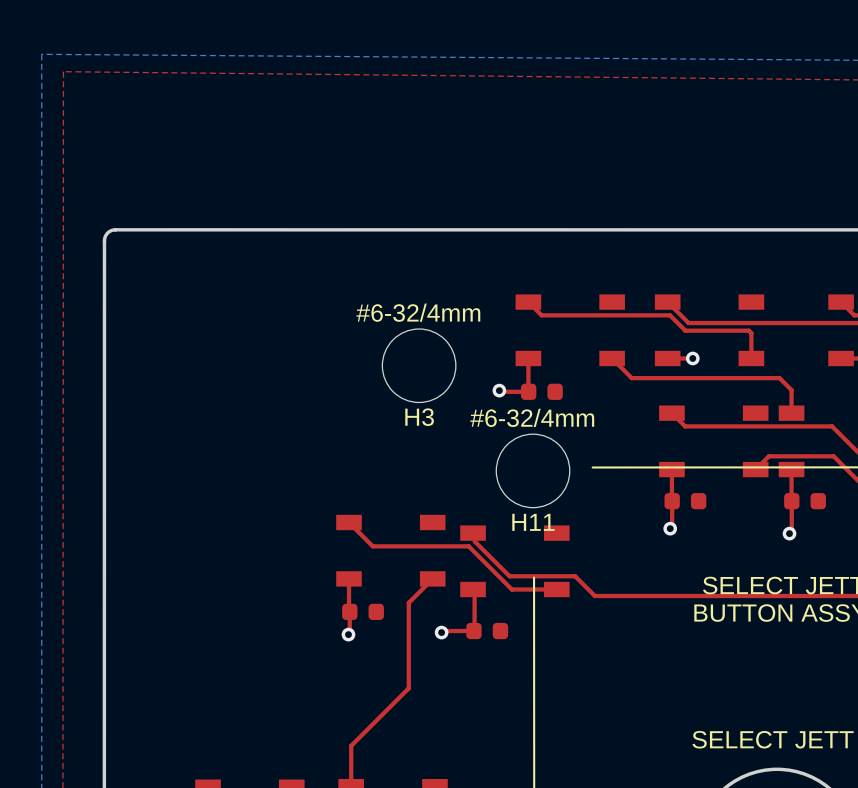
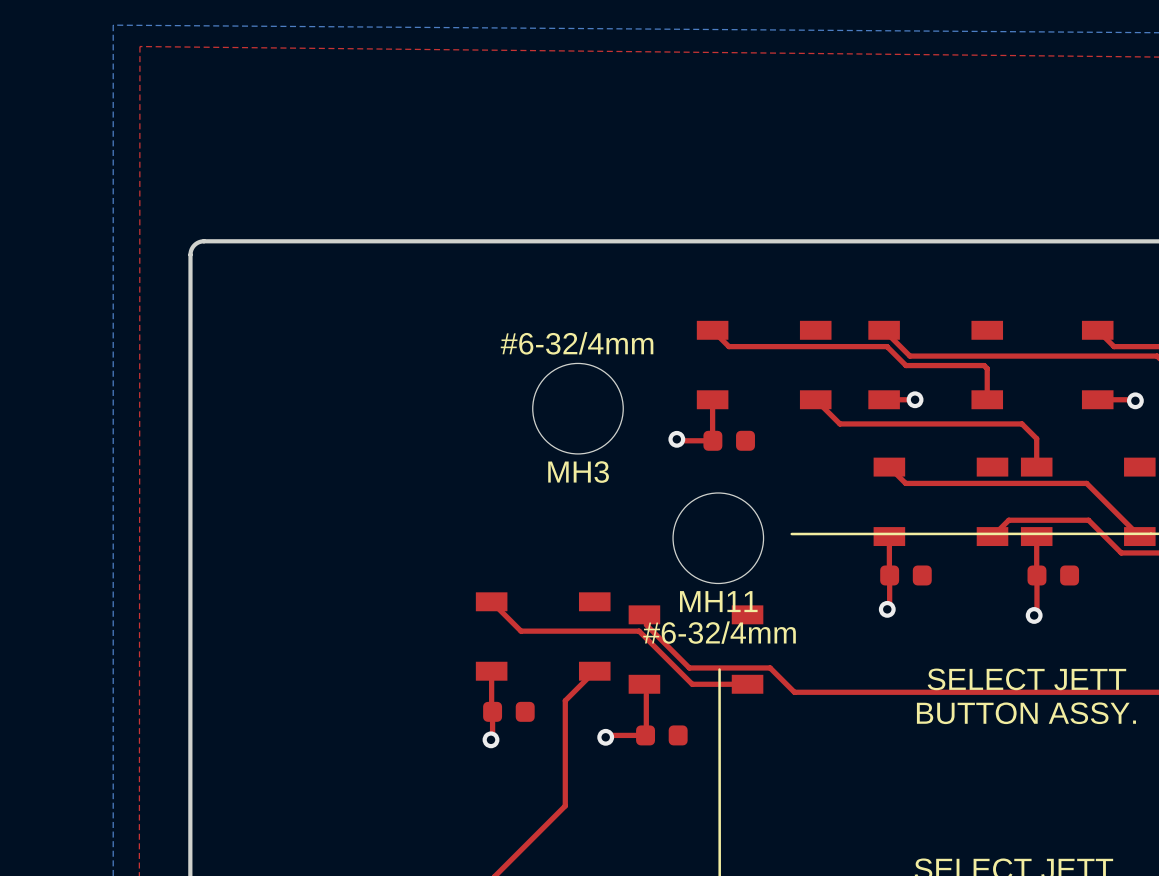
H3 name: H3 (419, 417) -> MH3 (578, 472)
H11 text position: #6-32/4mm (532, 417) -> #6-32/4mm (719, 632)
H11 name: H11 (533, 522) -> MH11 (718, 601)

